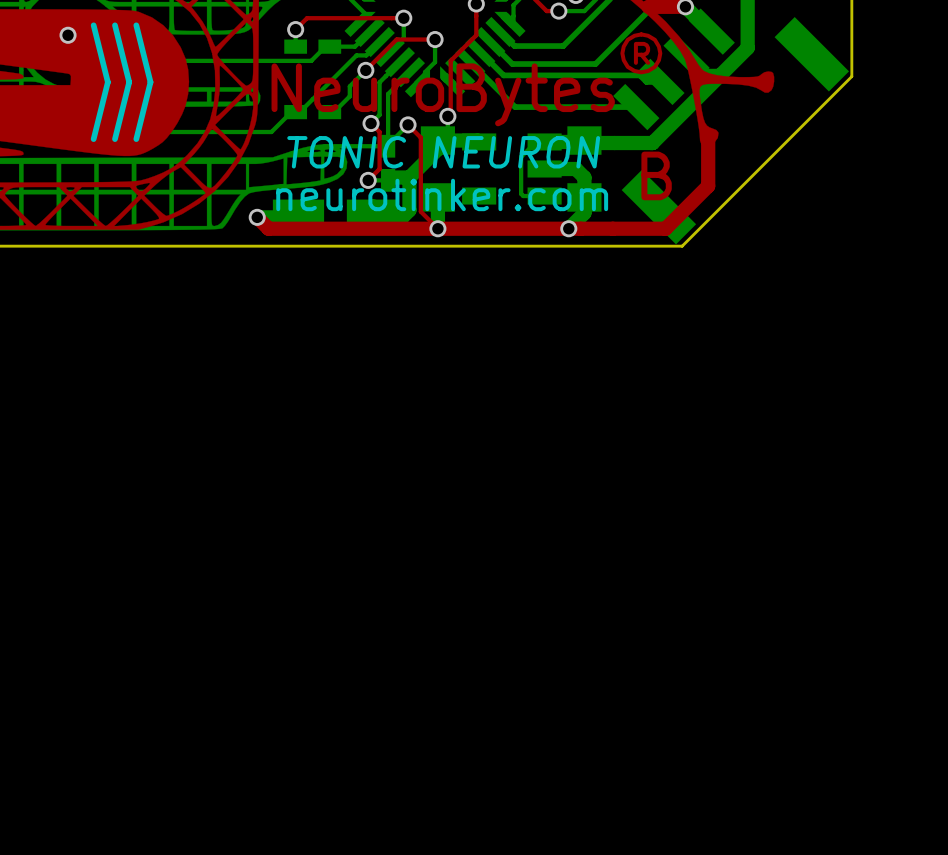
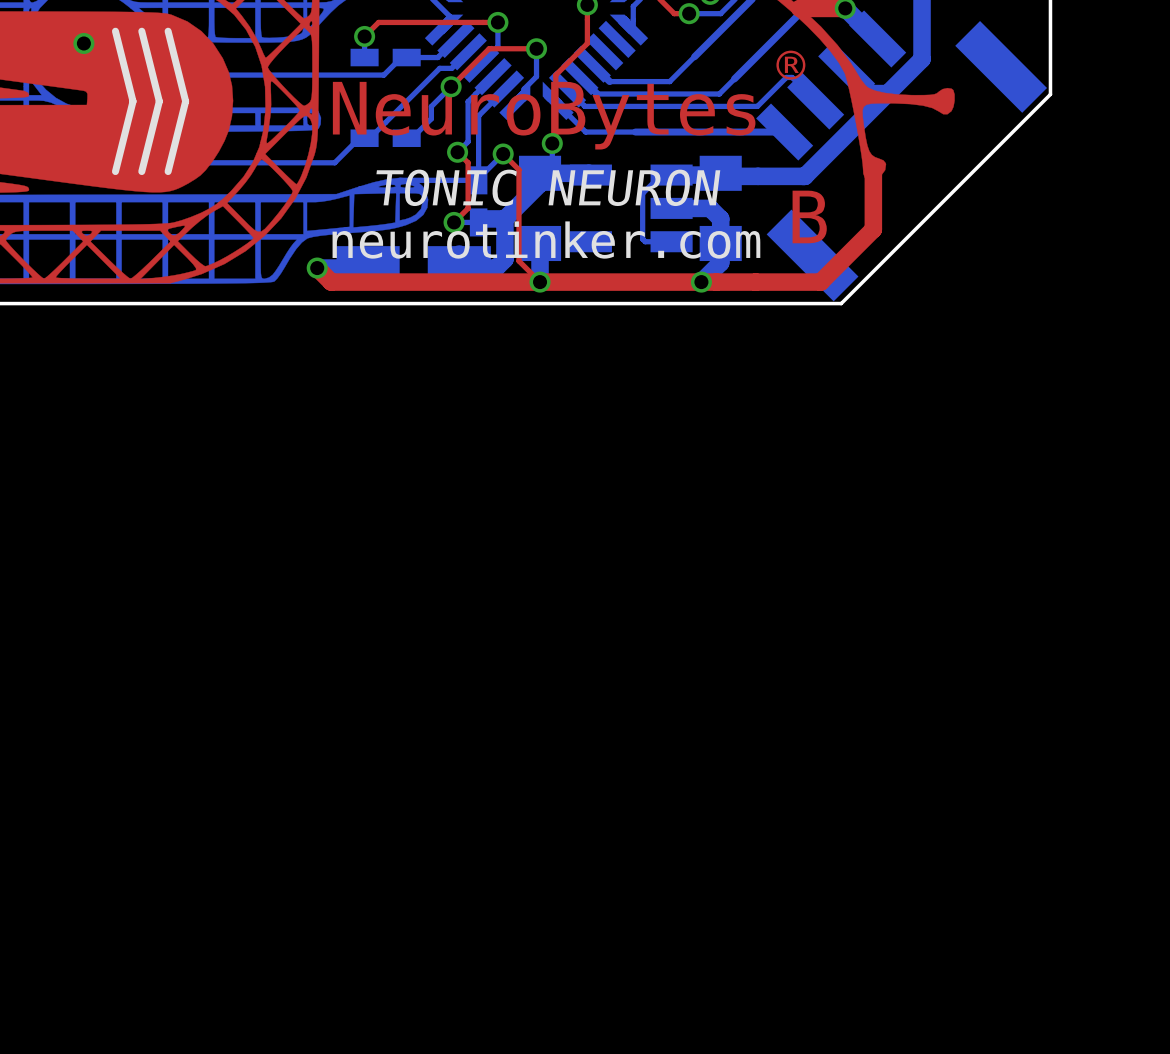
bottom track: (500, 31) (514, 46) (563, 46) -> (609, 81) (669, 81) (694, 56)
bottom track: (490, 42) (512, 64) (595, 64) -> (597, 94) (719, 94) (734, 78)
bottom track: (494, 66) (503, 75) (639, 75) (646, 81) (661, 81) -> (567, 89) (584, 106) (757, 106) (786, 77) (792, 77) (815, 101)
bottom track: (484, 76) (515, 107) -> (558, 105) (585, 132) (635, 132)

